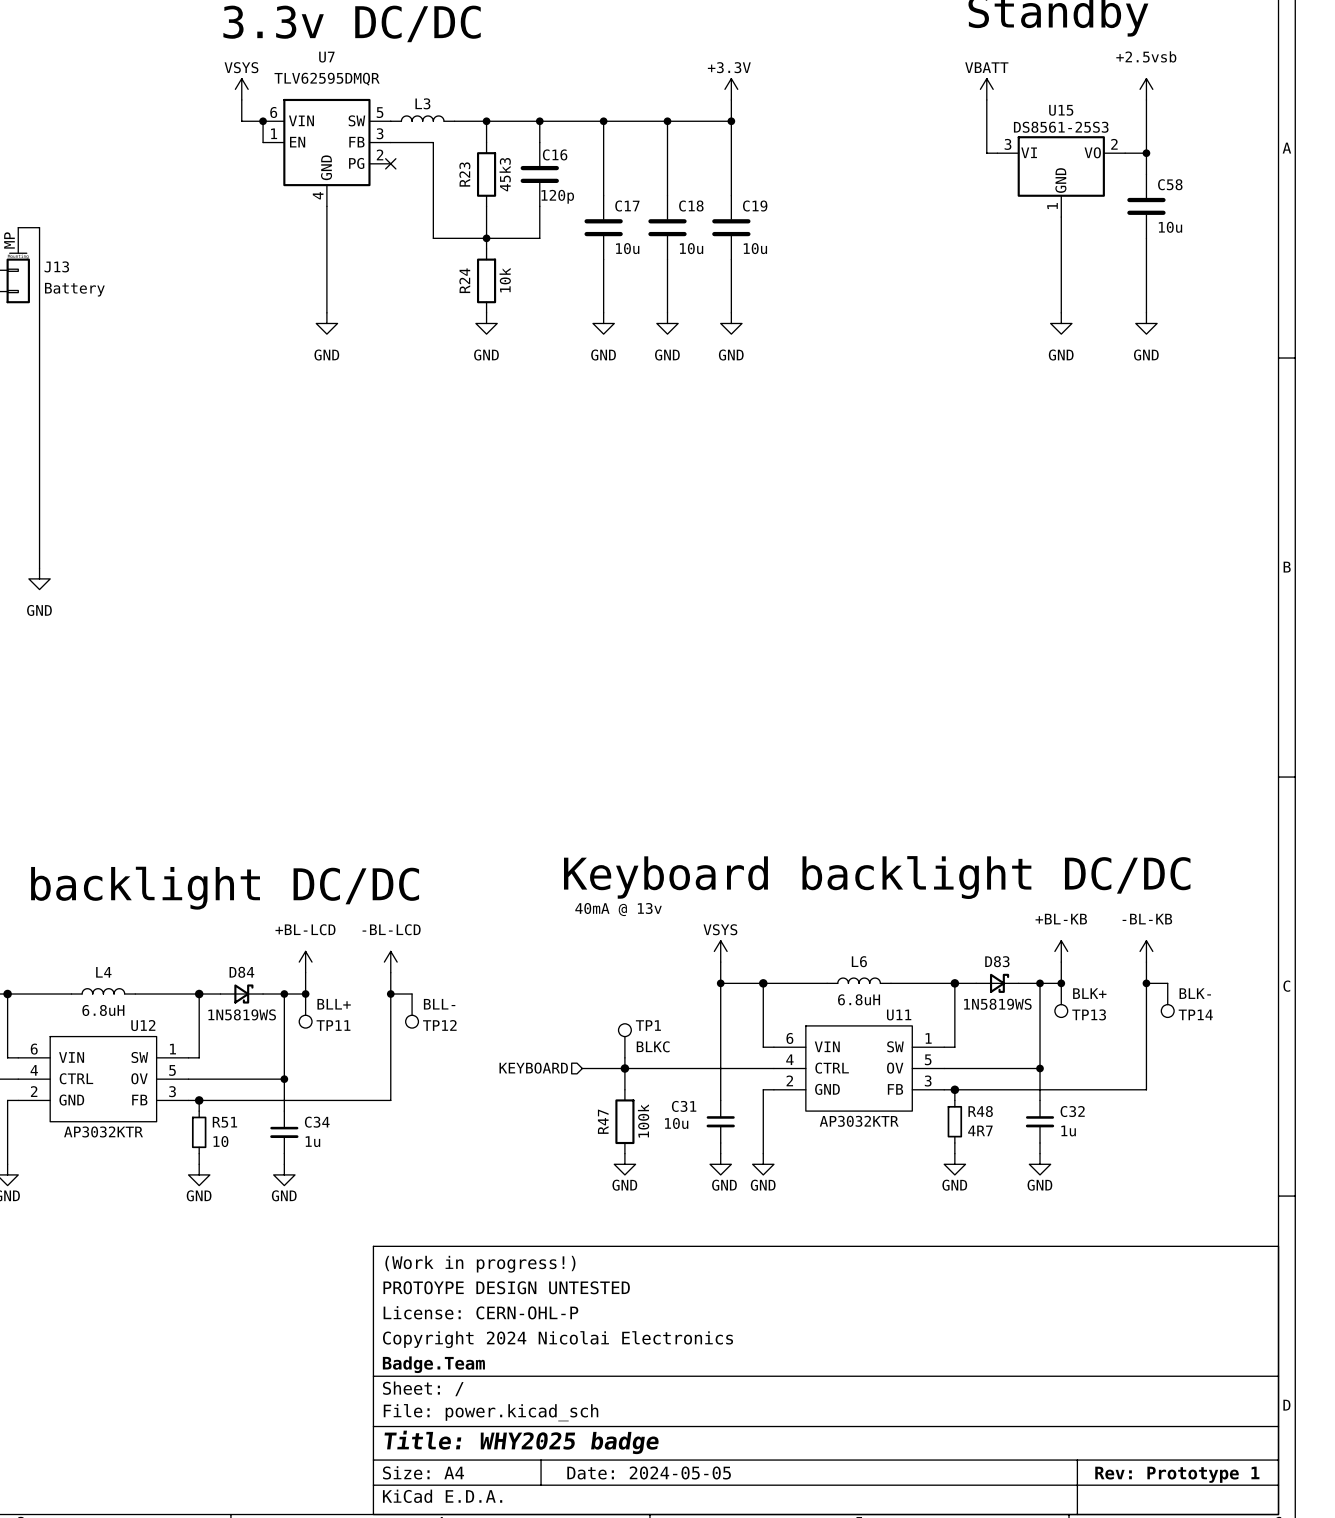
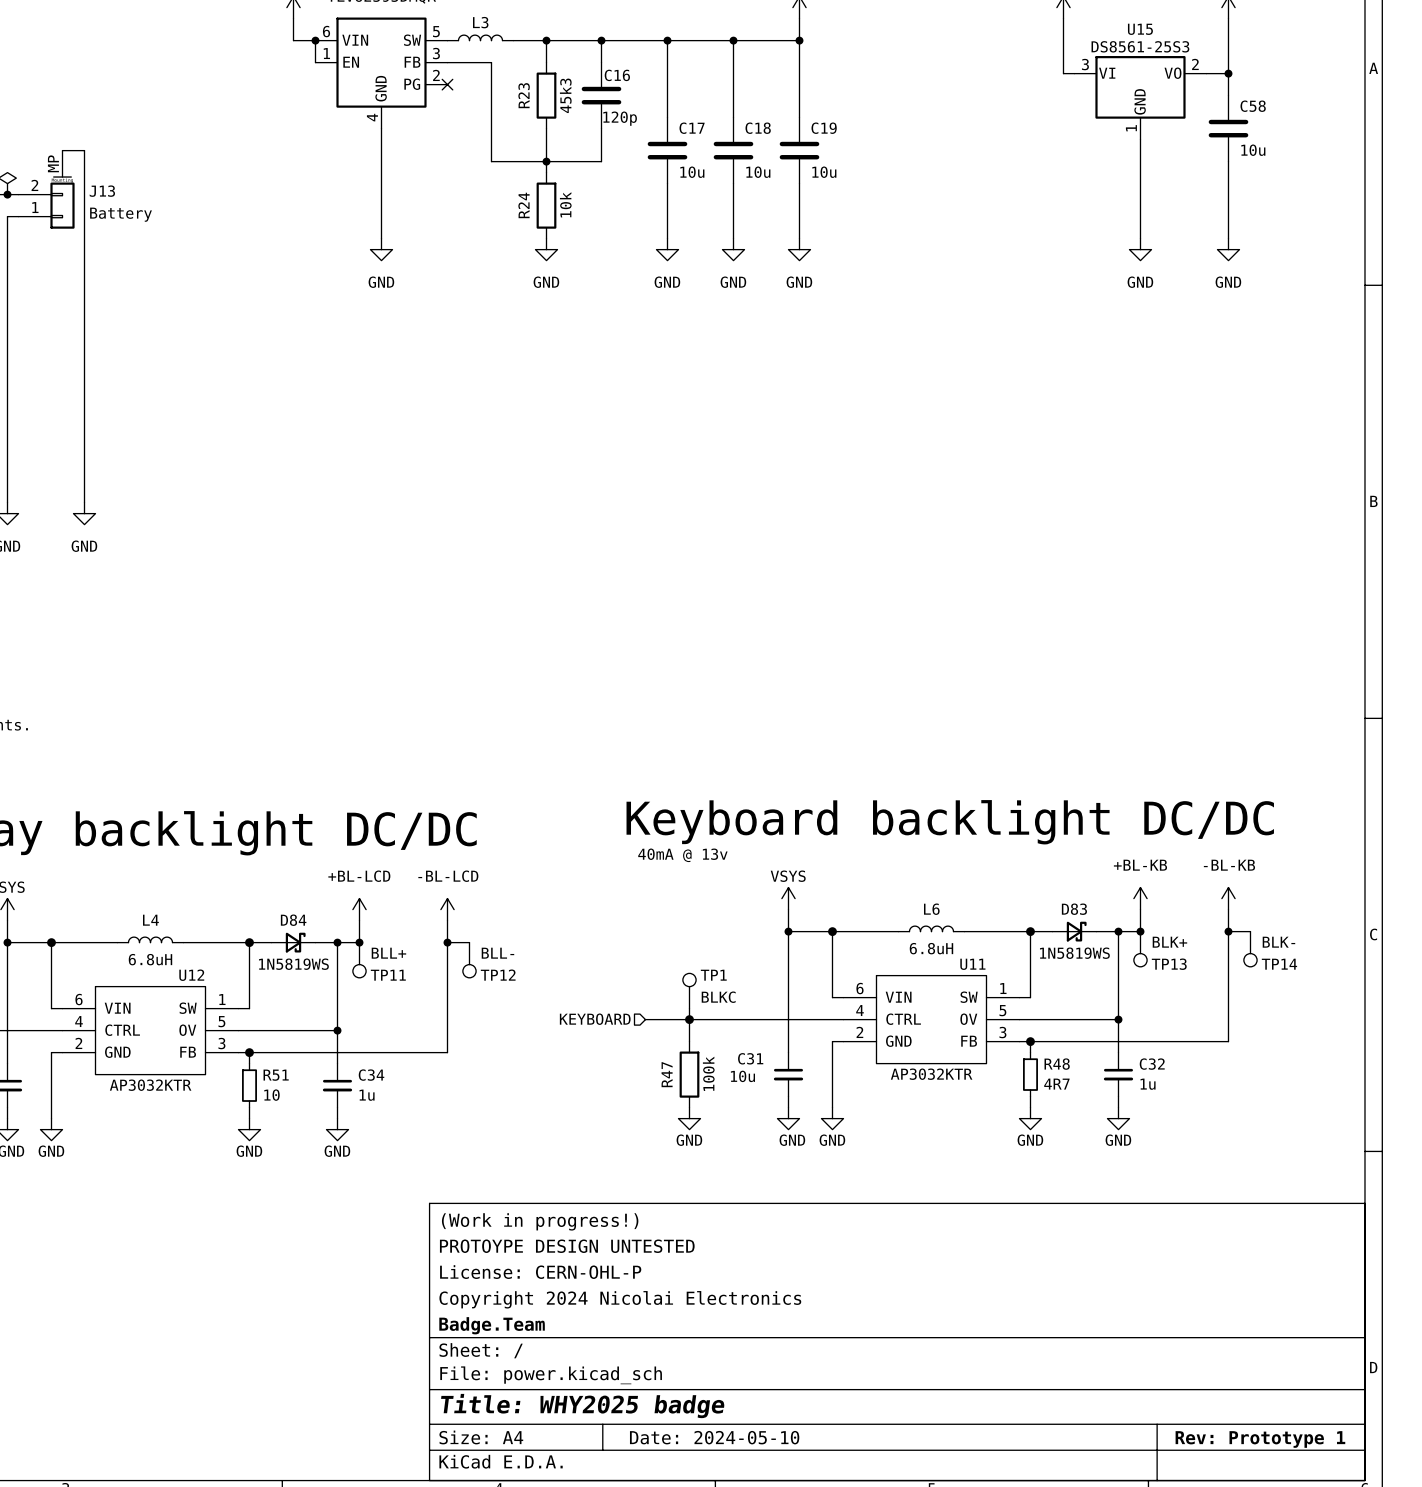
title block: Date: 2024-05-05 (649, 1472) -> Date: 2024-05-10 (714, 1437)

